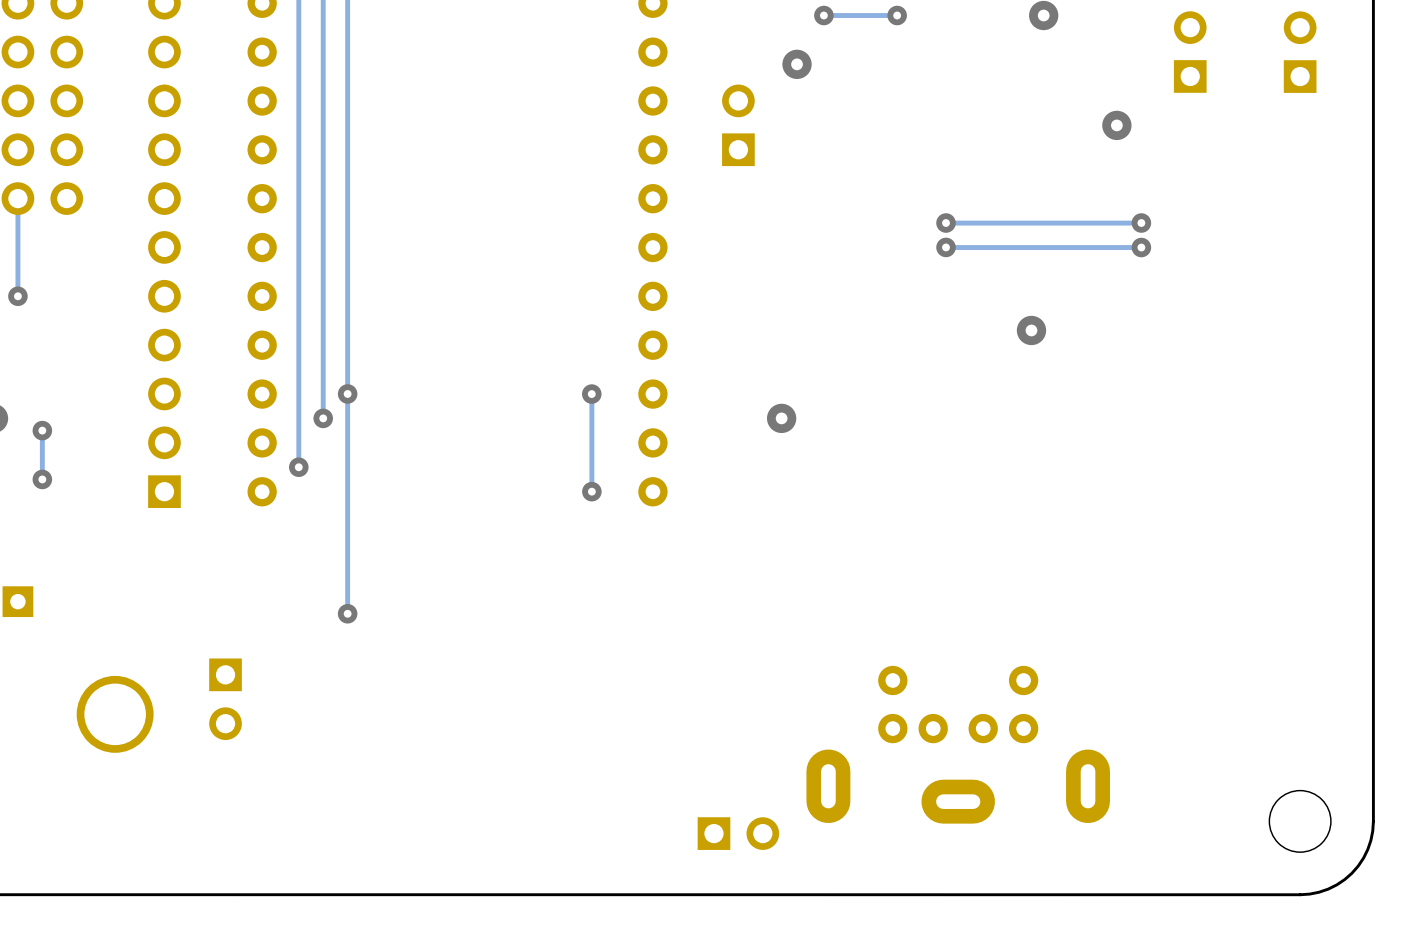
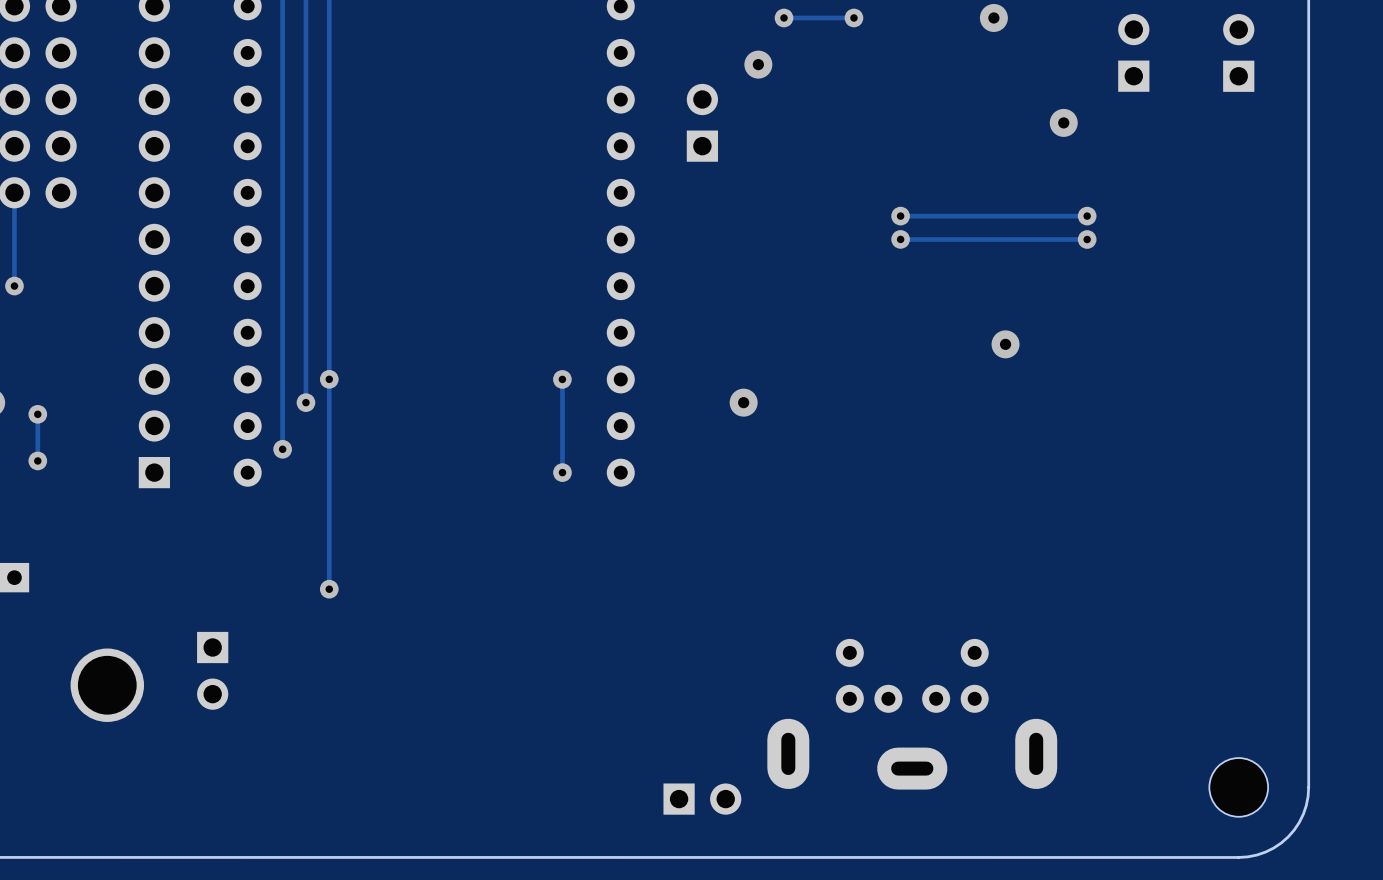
via position: (1031, 330) -> (1005, 344)

